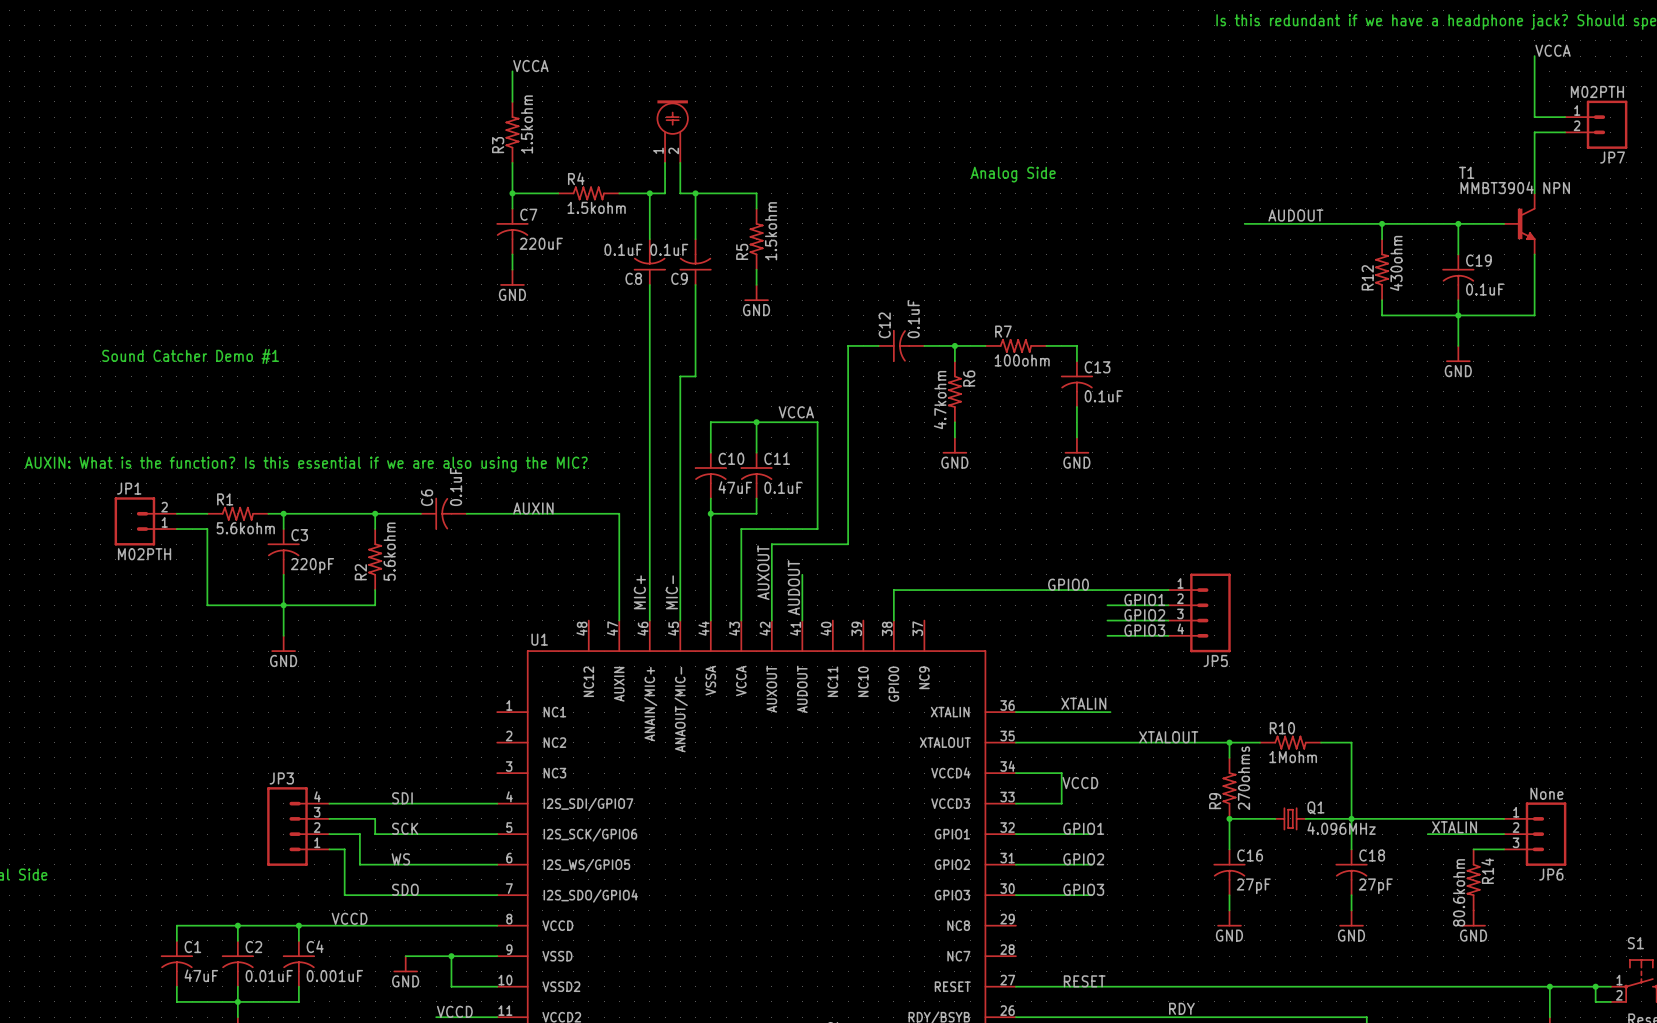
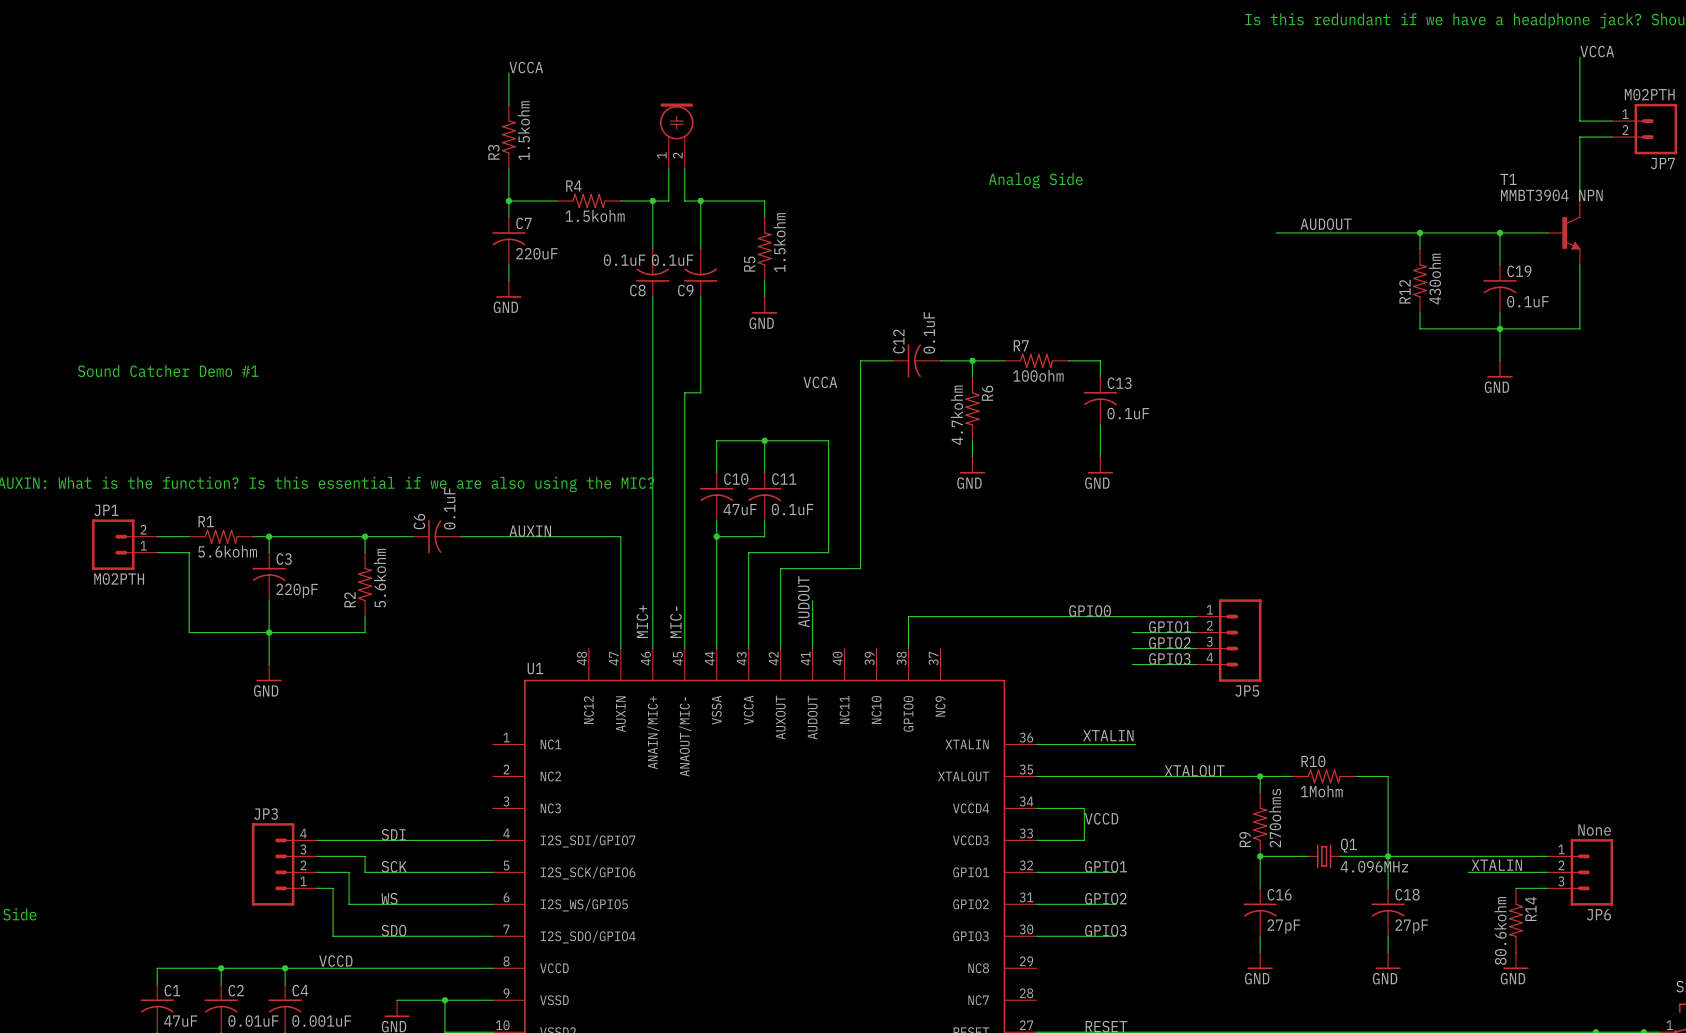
label position: VCCA (796, 412) -> VCCA (820, 382)
label: AUXOUT (763, 572) -> none
label position: AUDOUT (793, 587) -> AUDOUT (803, 601)

